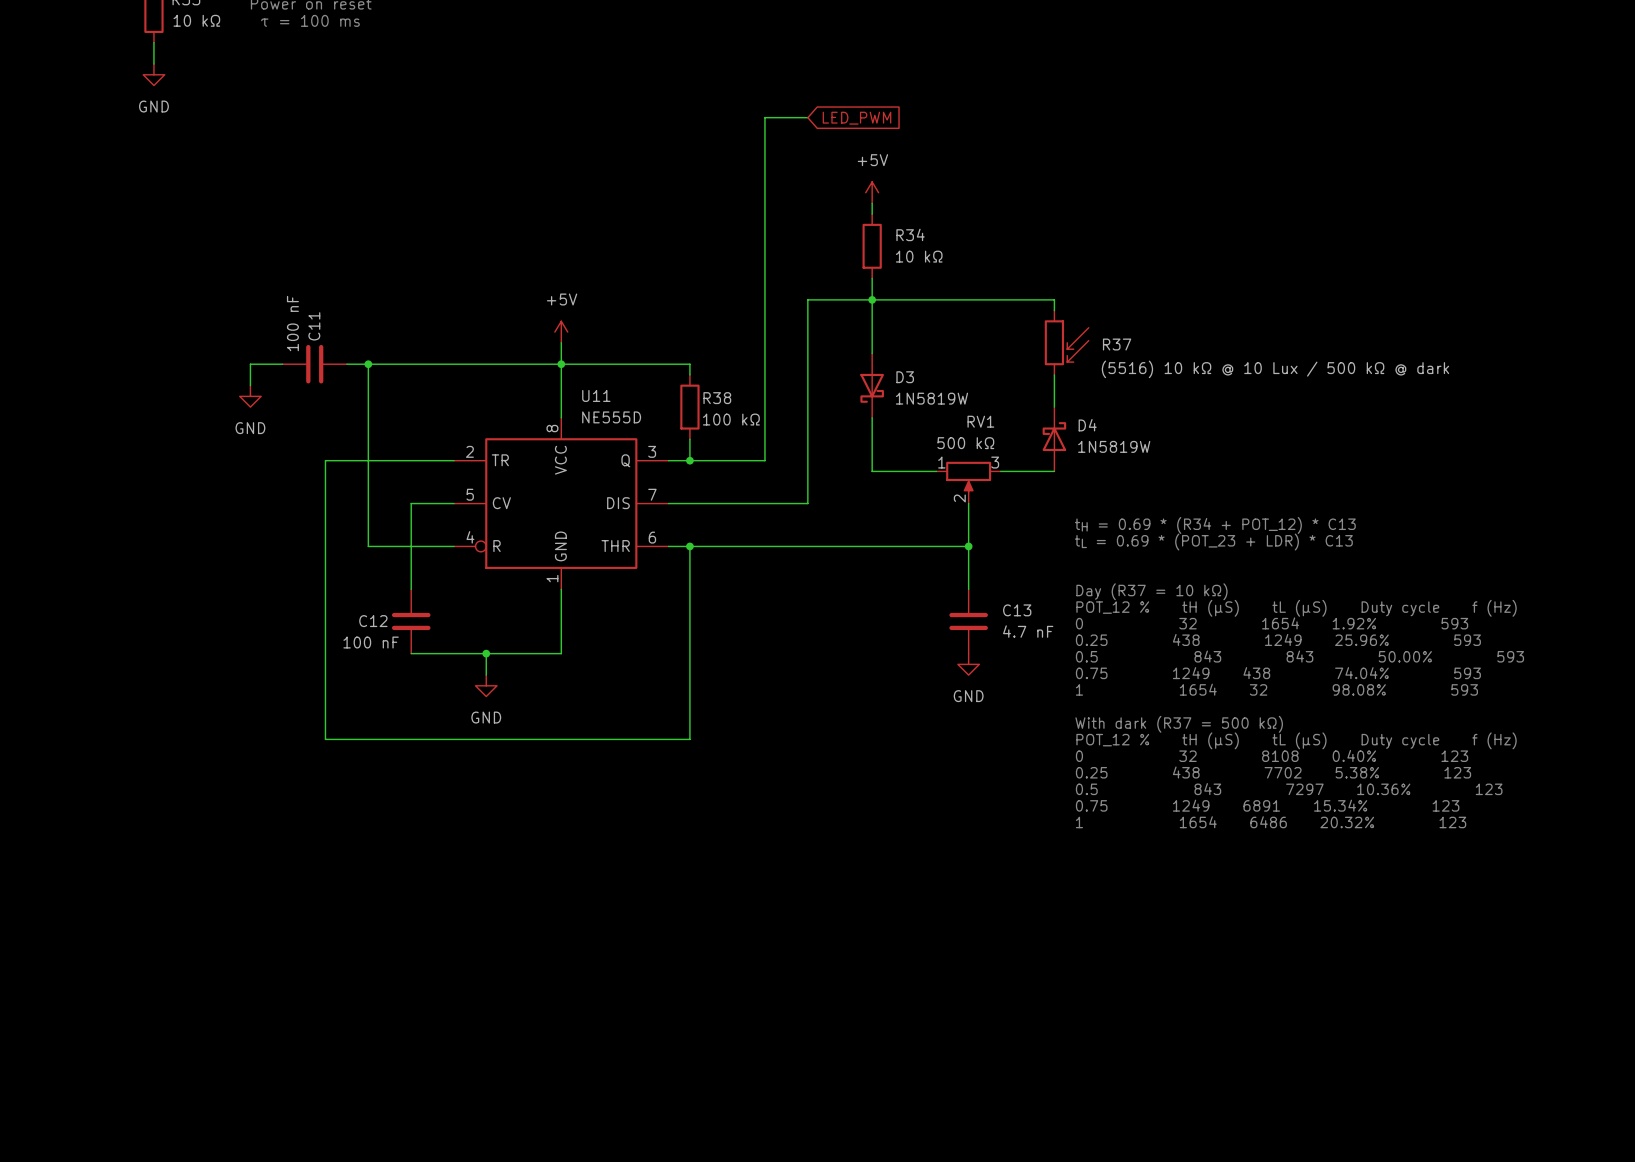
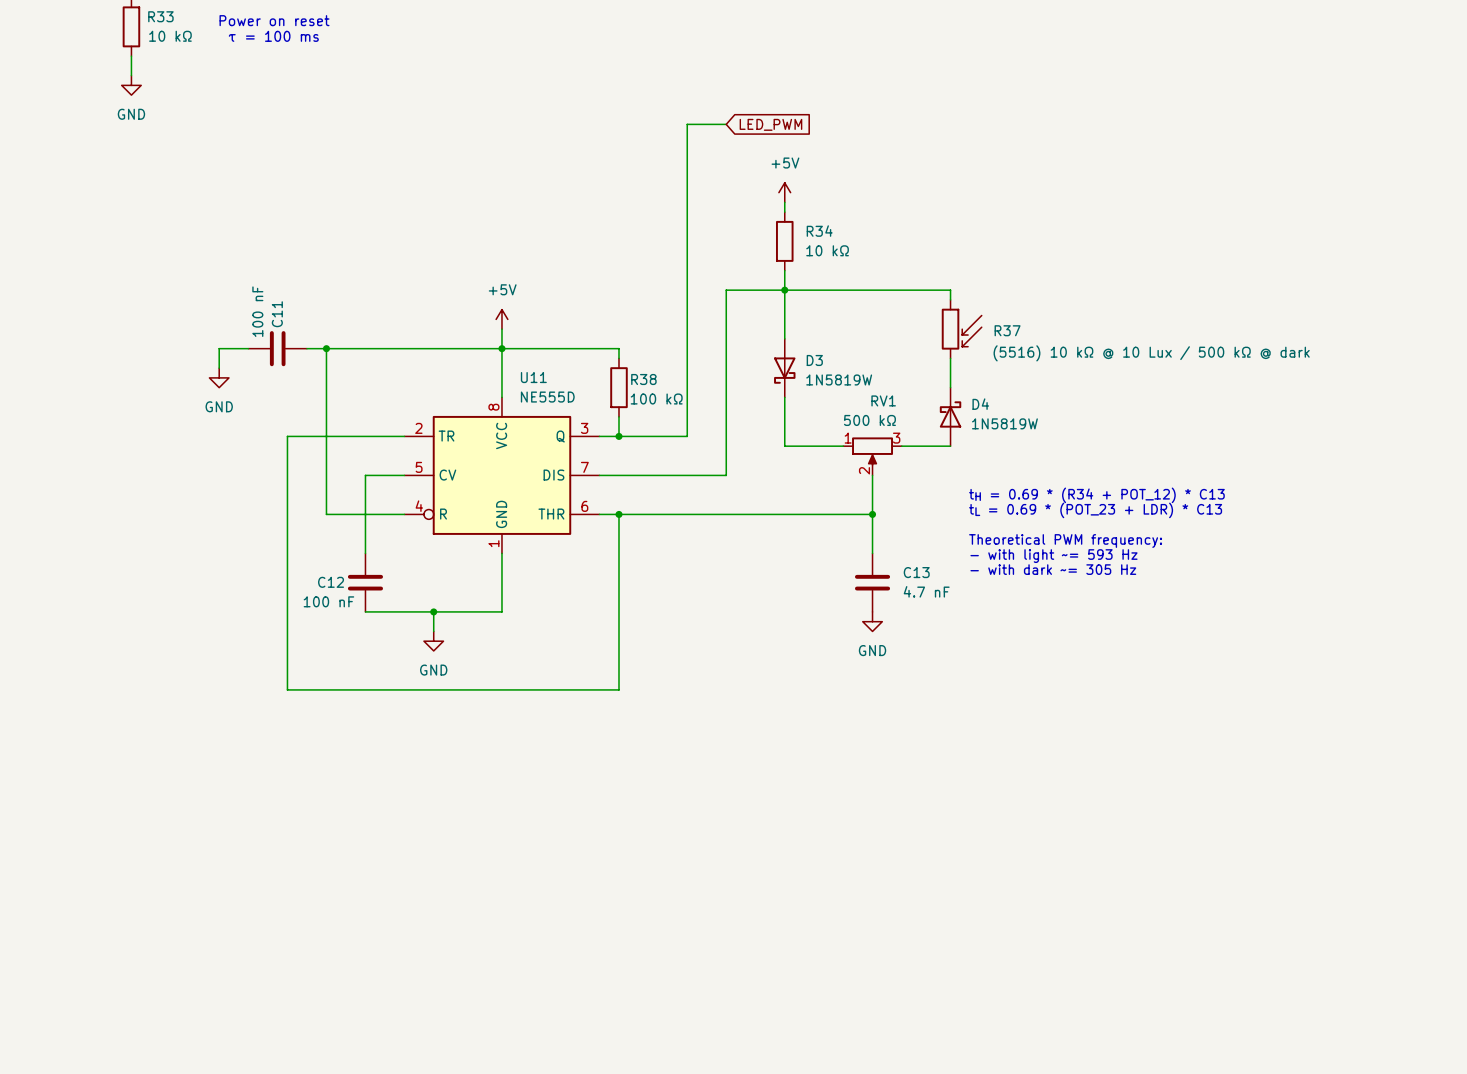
text: none -> Theoretical PWM frequency: (1065, 541)
text: Day (R37 = 10 kΩ) (1151, 591) -> - with light ~= 593 Hz (1053, 556)
text: POT_12 % tH (µS) tL (µS) Duty cycle f (Hz) (1296, 608) -> - with dark ~= 305 Hz (1053, 569)
text: 0 32 1654 1.92% 593 (1272, 623) -> none
text: 0.25 438 1249 25.96% 593 (1278, 639) -> none
text: 0.5 843 843 50.00% 593 (1299, 656) -> none
text: 0.75 1249 438 74.04% 593 (1278, 673) -> none
text: 1 1654 32 98.08% 593 (1276, 689) -> none
text: With dark (R37 = 500 kΩ) (1179, 724) -> none
text: POT_12 % tH (µS) tL (µS) Duty cycle f (Hz) (1296, 740) -> none
text: 0 32 8108 0.40% 123 (1272, 755) -> none
text: 0.25 438 7702 5.38% 123 (1273, 772) -> none
text: 0.5 843 7297 10.36% 123 (1289, 789) -> none
text: 0.75 1249 6891 15.34% 123 (1267, 805) -> none
text: 1 1654 6486 20.32% 123 (1271, 822) -> none

